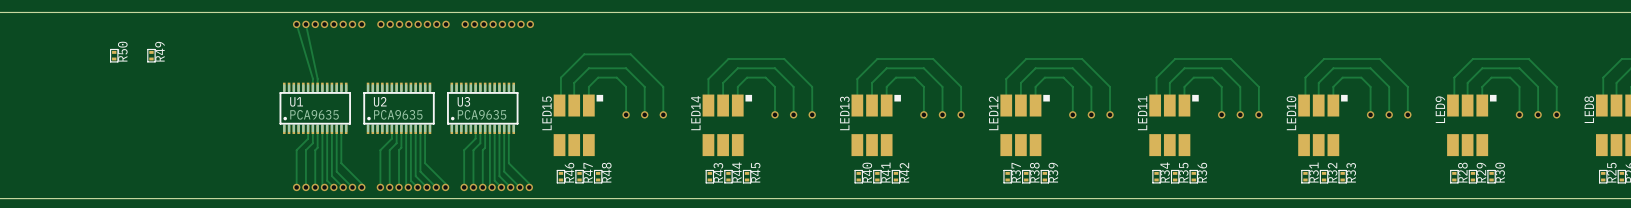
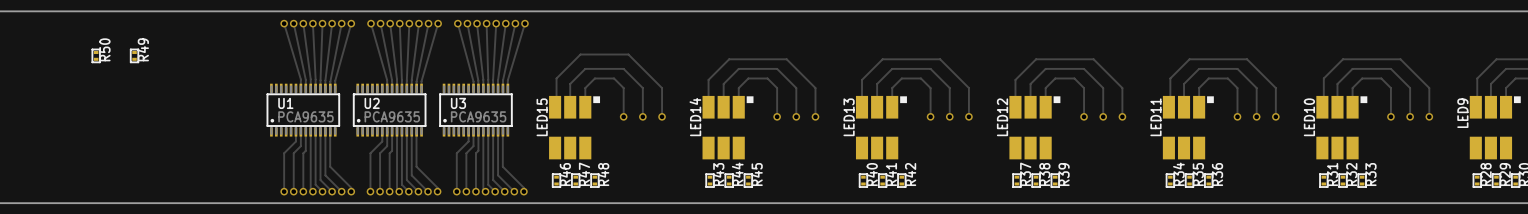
track: none -> (303, 23) (310, 88)
track: none -> (312, 23) (315, 88)
track: none -> (322, 23) (320, 88)
track: none -> (332, 23) (325, 88)
track: none -> (341, 23) (330, 88)
track: none -> (351, 23) (335, 80) (335, 88)
track: none -> (371, 23) (387, 80) (387, 88)
track: none -> (380, 23) (392, 88)
track: none -> (390, 23) (397, 88)
track: none -> (399, 23) (401, 88)
track: none -> (409, 23) (406, 88)
track: none -> (418, 23) (411, 88)
track: none -> (428, 23) (416, 88)
track: none -> (438, 23) (421, 81) (421, 88)
track: none -> (457, 23) (473, 81) (473, 88)
track: none -> (467, 23) (478, 88)
track: none -> (477, 23) (483, 88)
track: none -> (486, 23) (488, 88)
track: none -> (496, 23) (493, 88)
track: none -> (505, 23) (498, 88)
track: none -> (515, 23) (502, 88)
track: none -> (524, 23) (507, 80) (507, 88)

